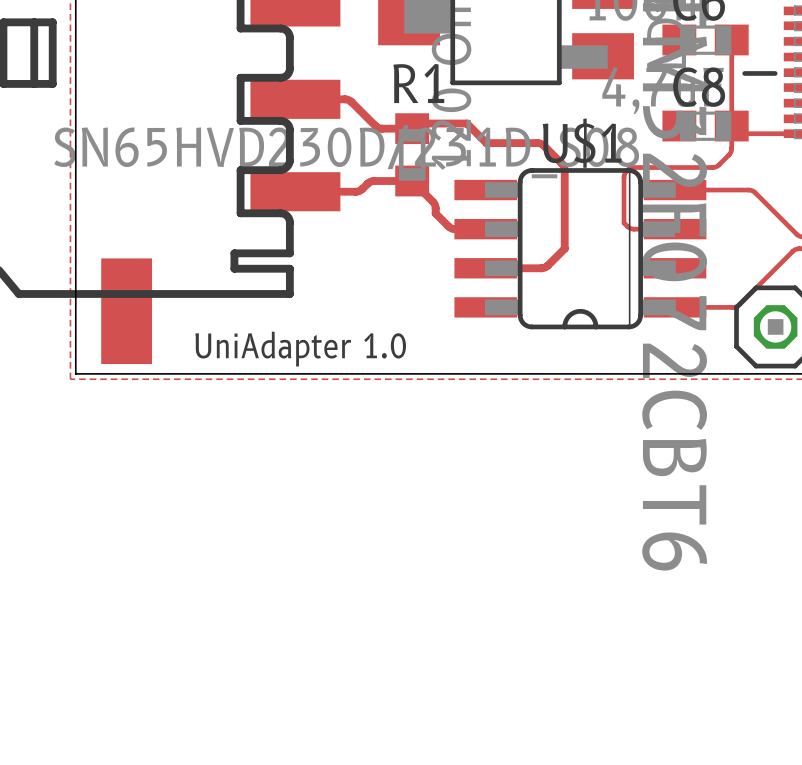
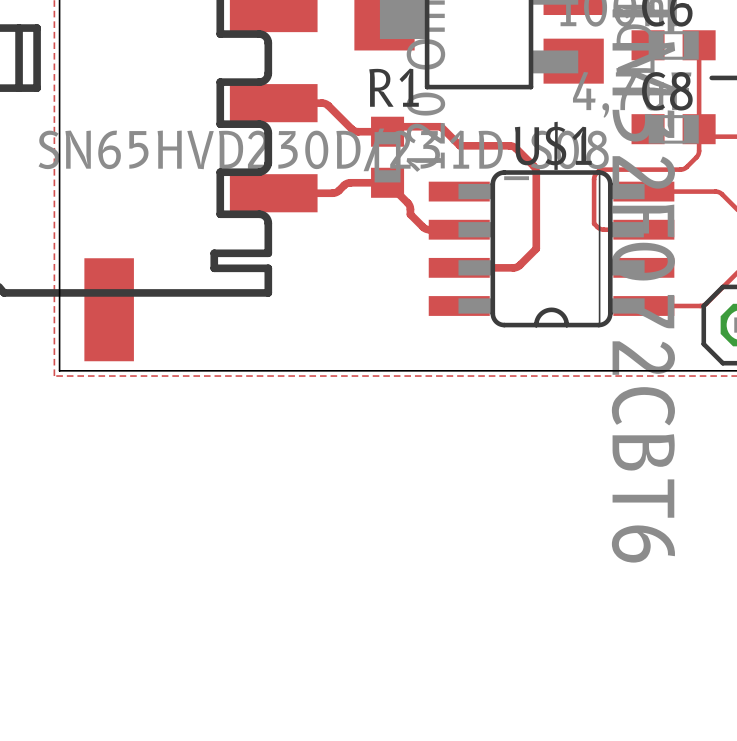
text: UniAdapter 1.0 (300, 349) -> none

